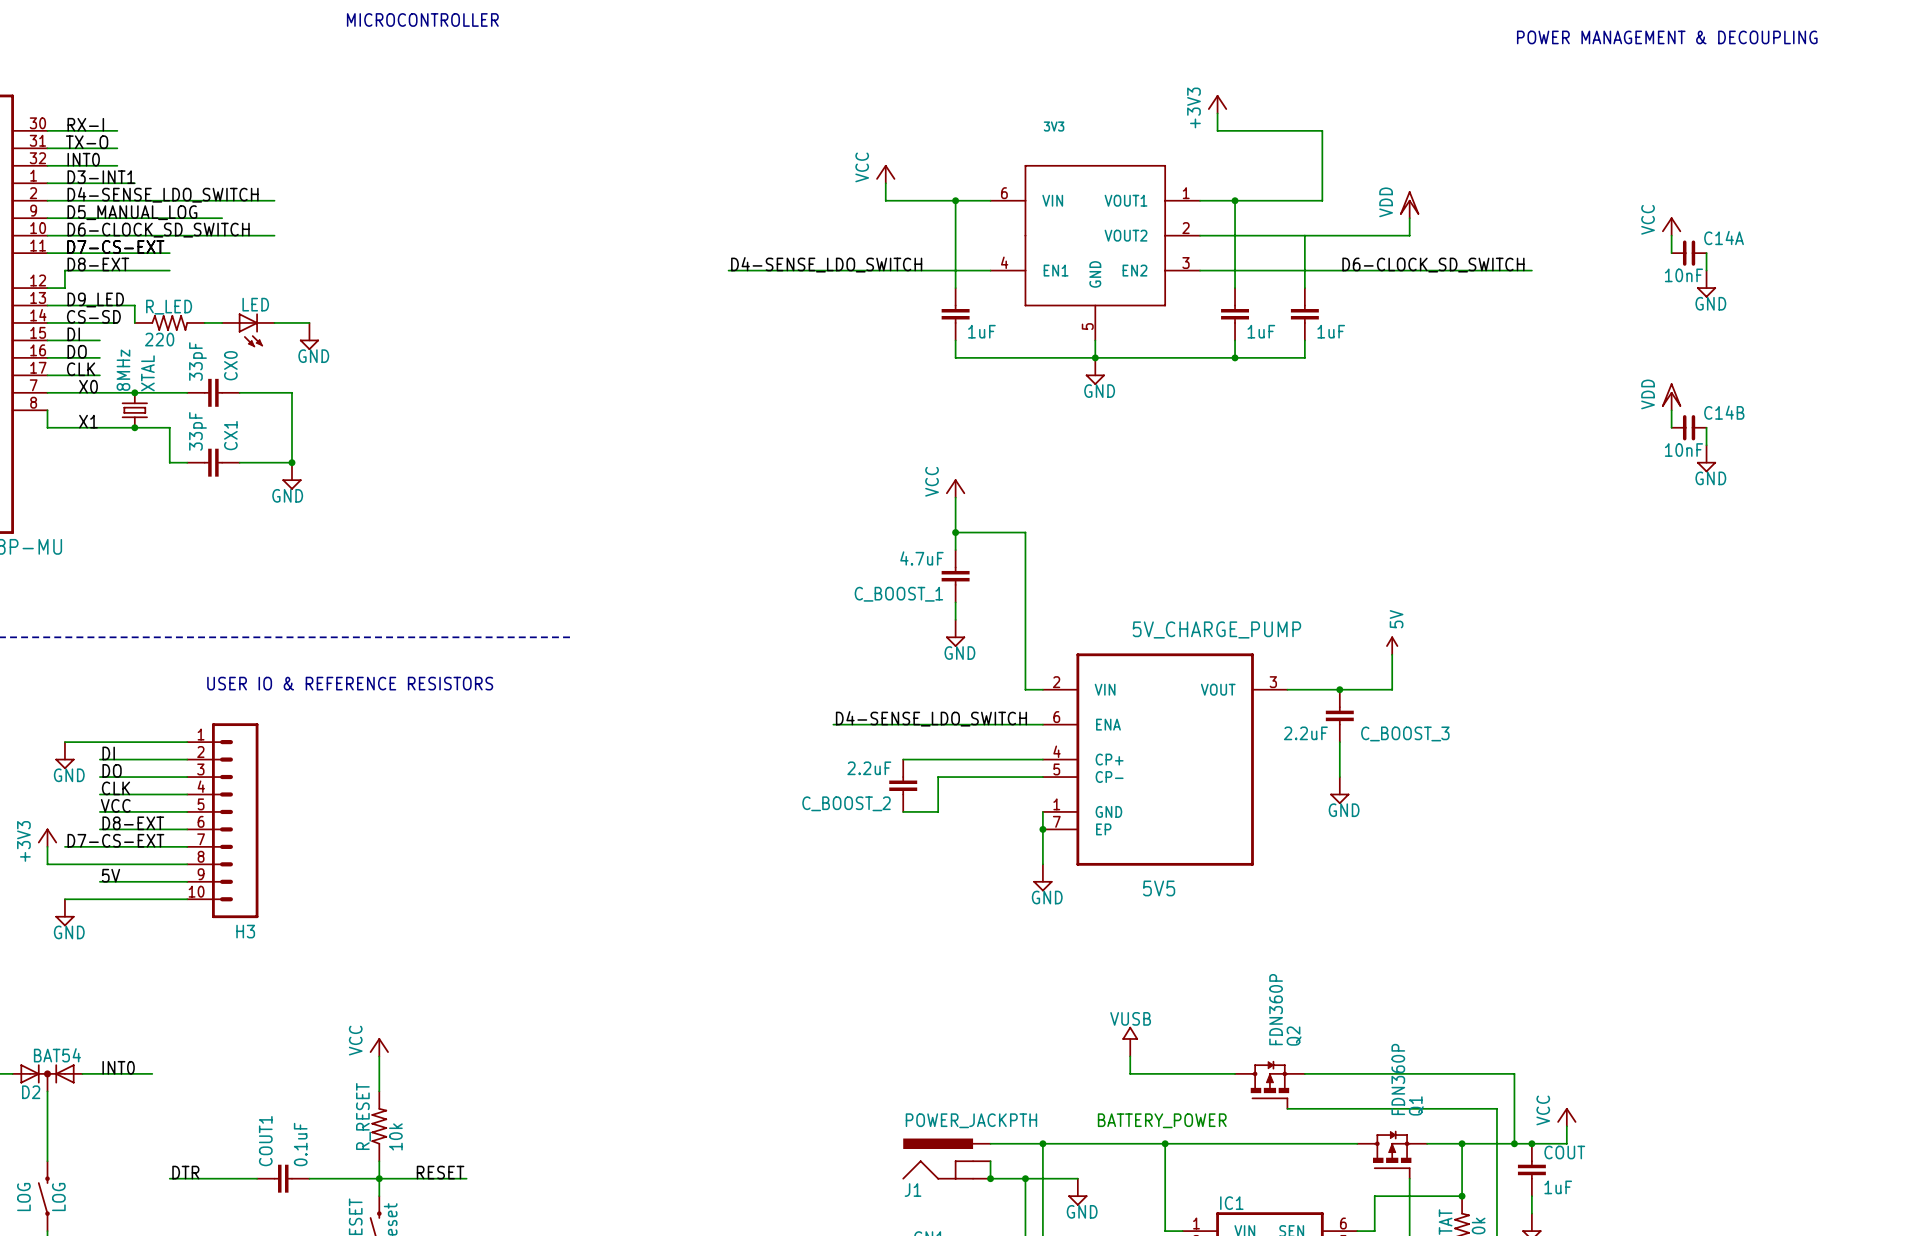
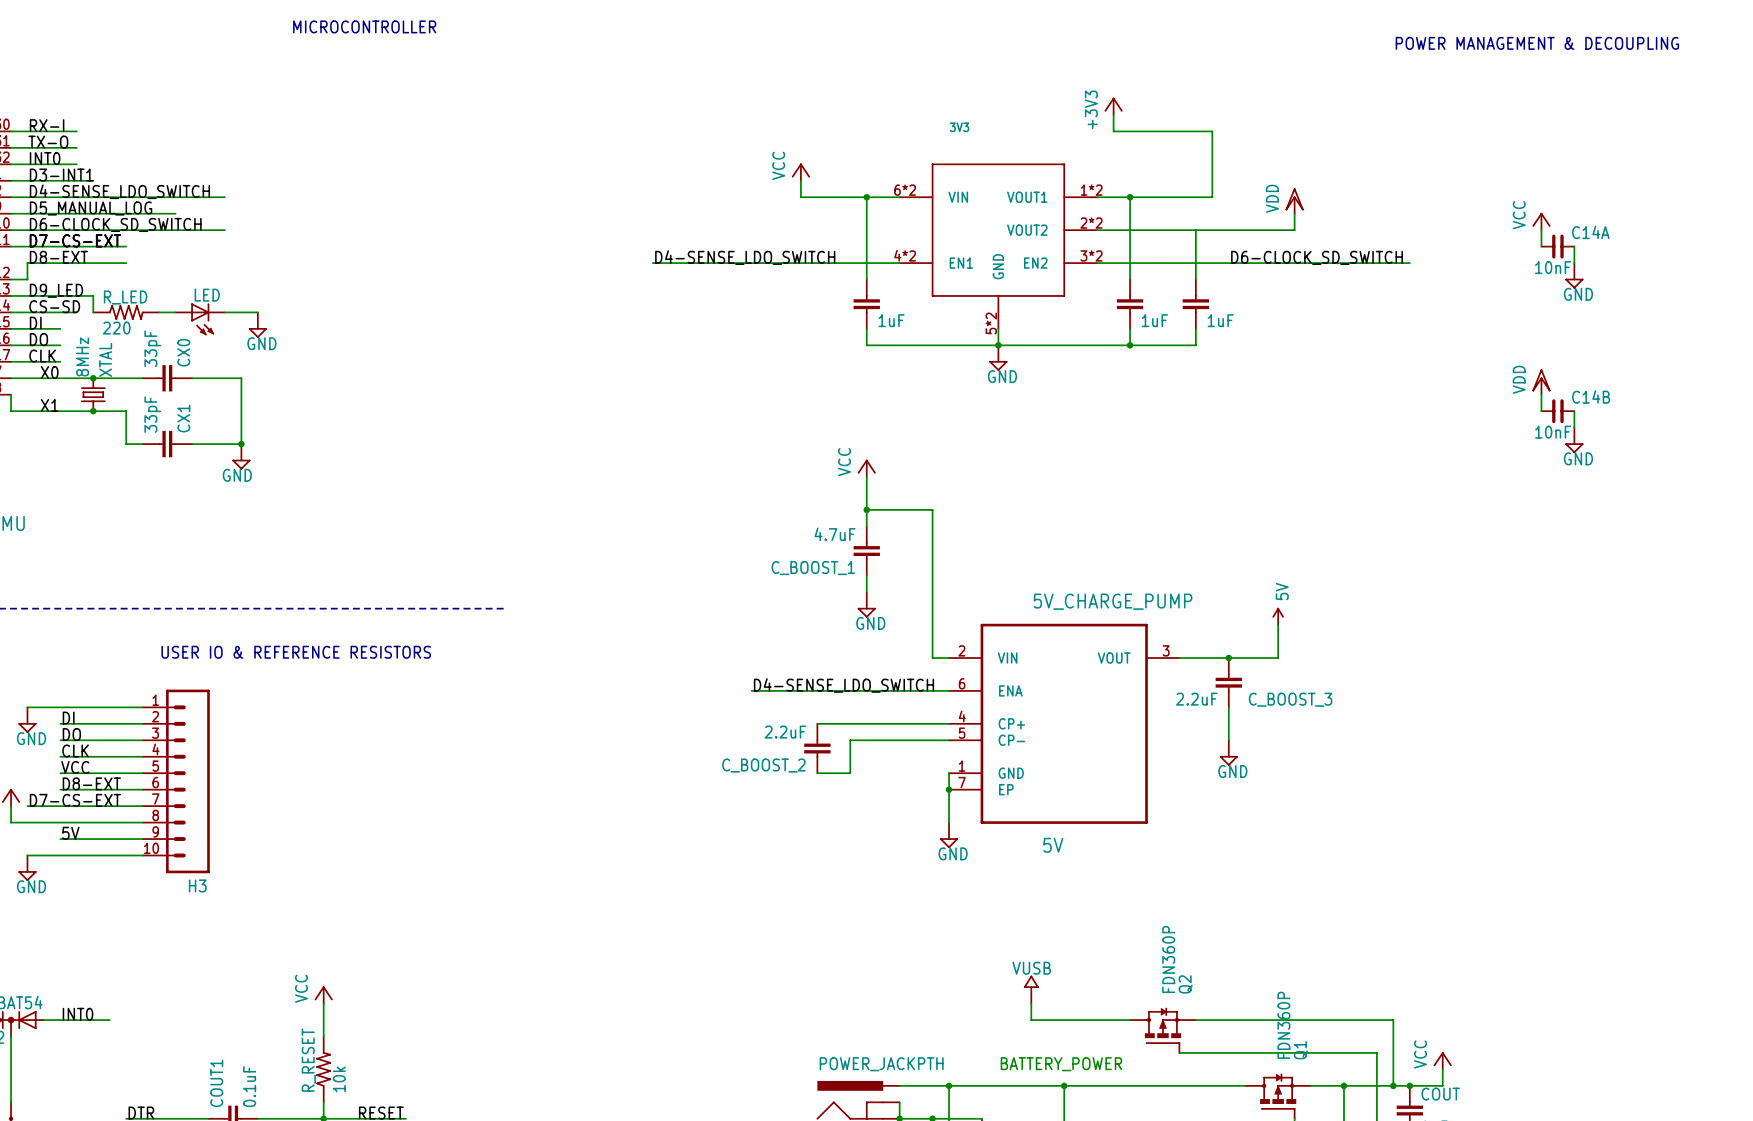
3V3 symbol: [990, 164, 1201, 341] -> [899, 163, 1098, 329]
5V_CHARGE_PUMP value: 5V5 (1159, 888) -> 5V (1053, 845)

